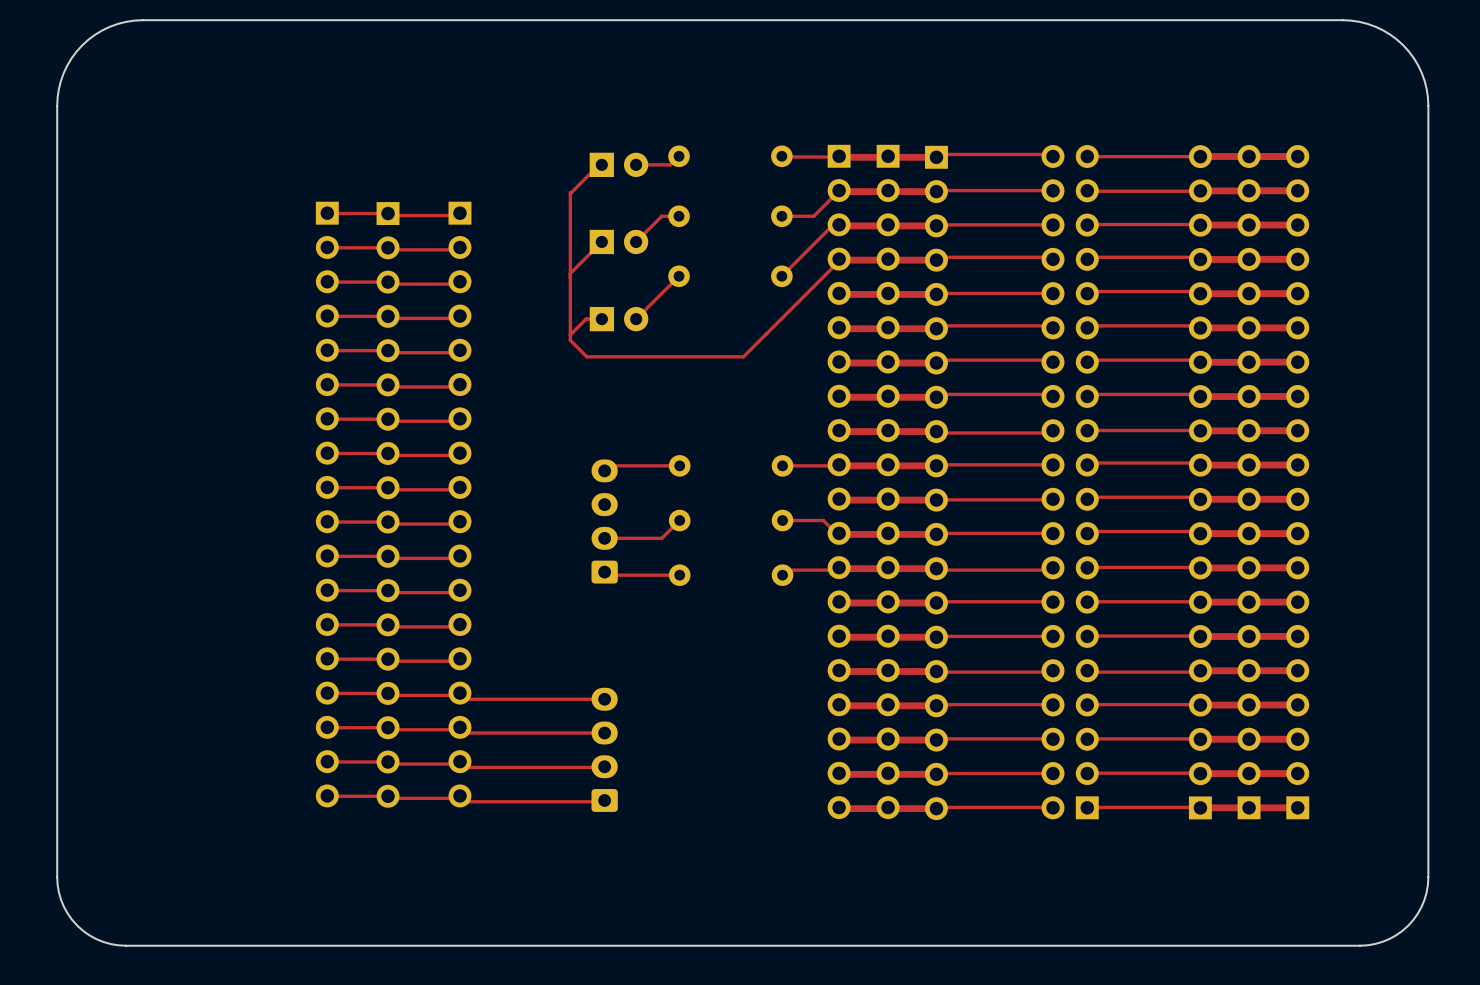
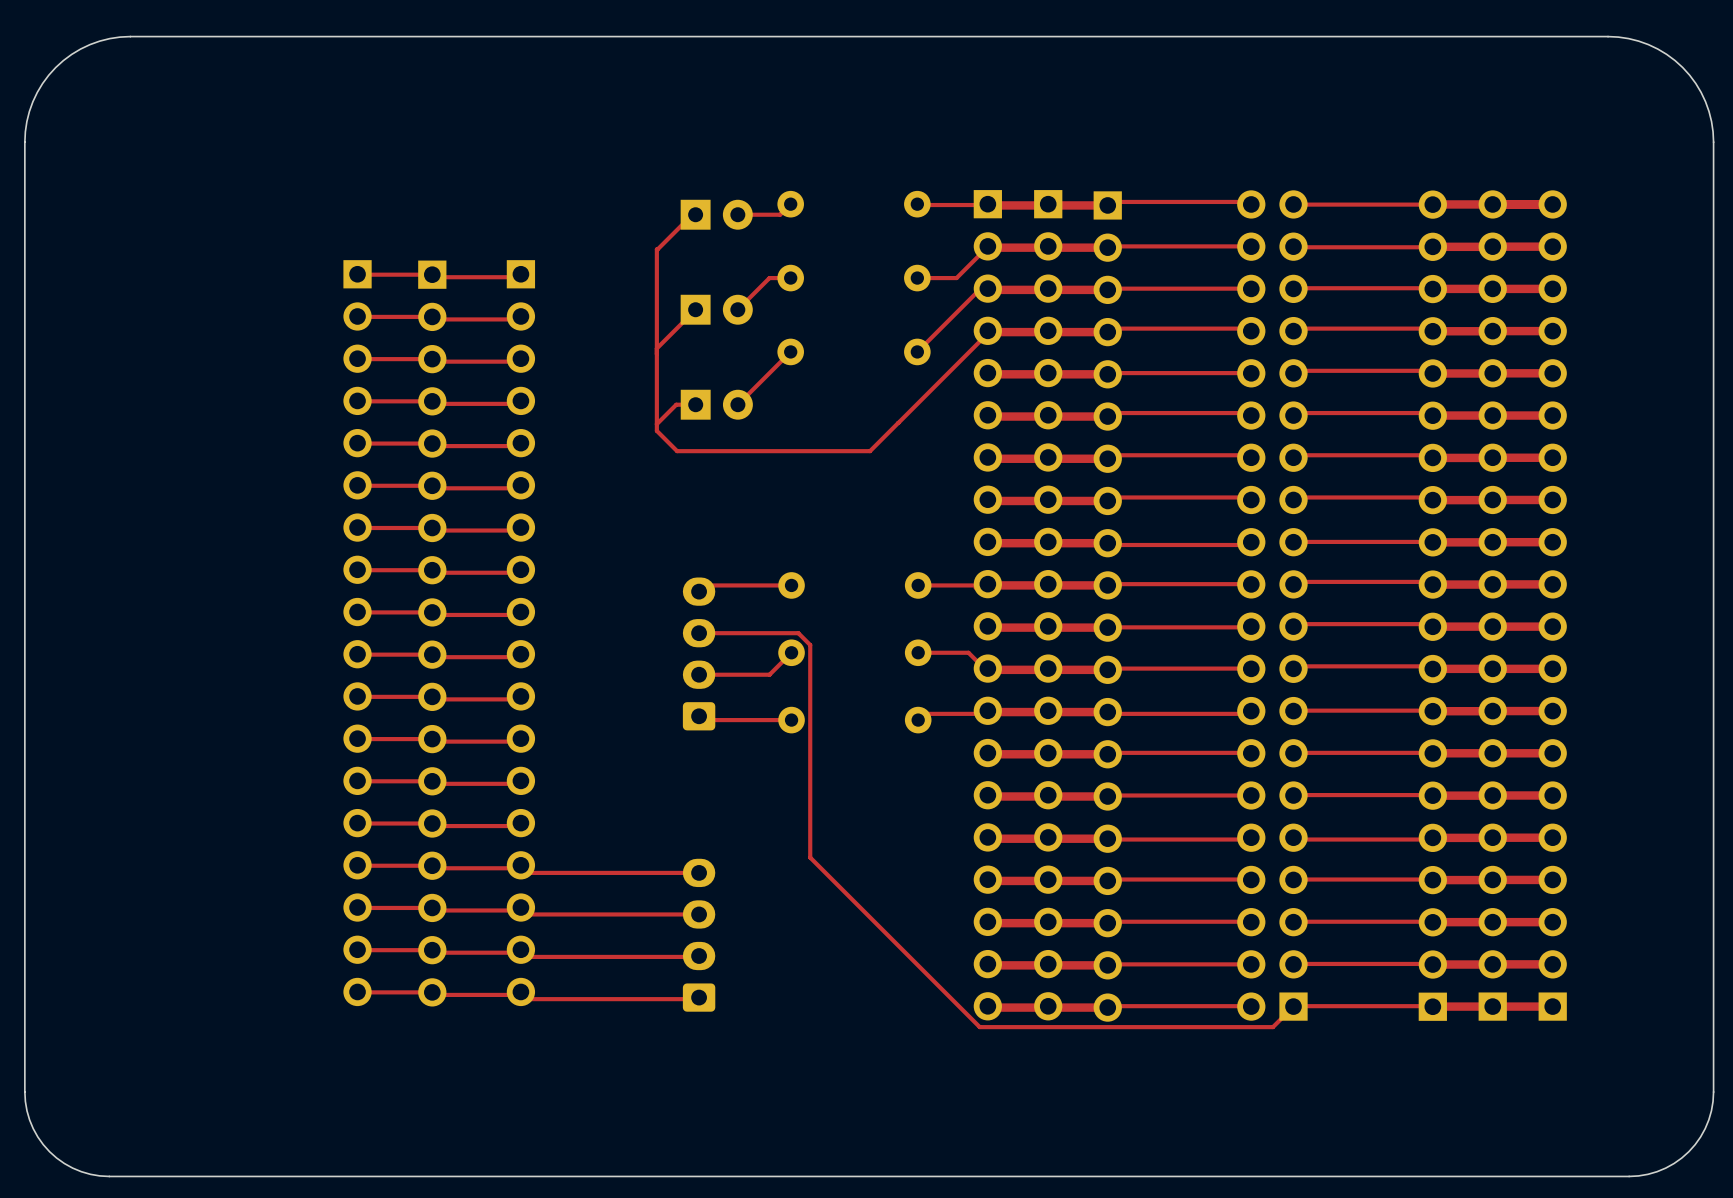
top track: none -> (699, 633) (798, 633) (810, 645) (810, 857) (979, 1027) (1272, 1027) (1292, 1007)

